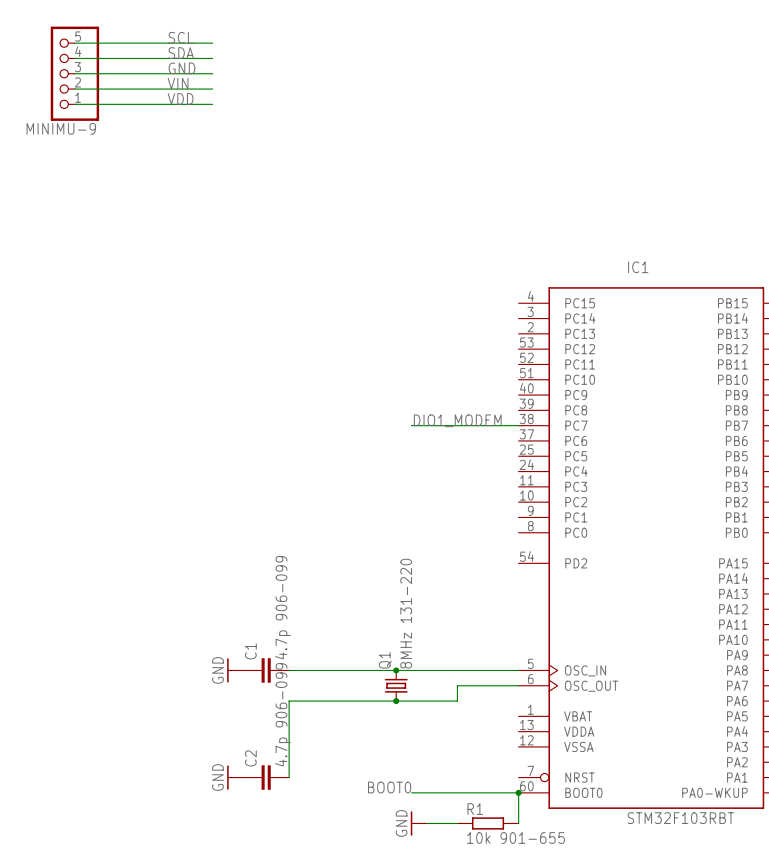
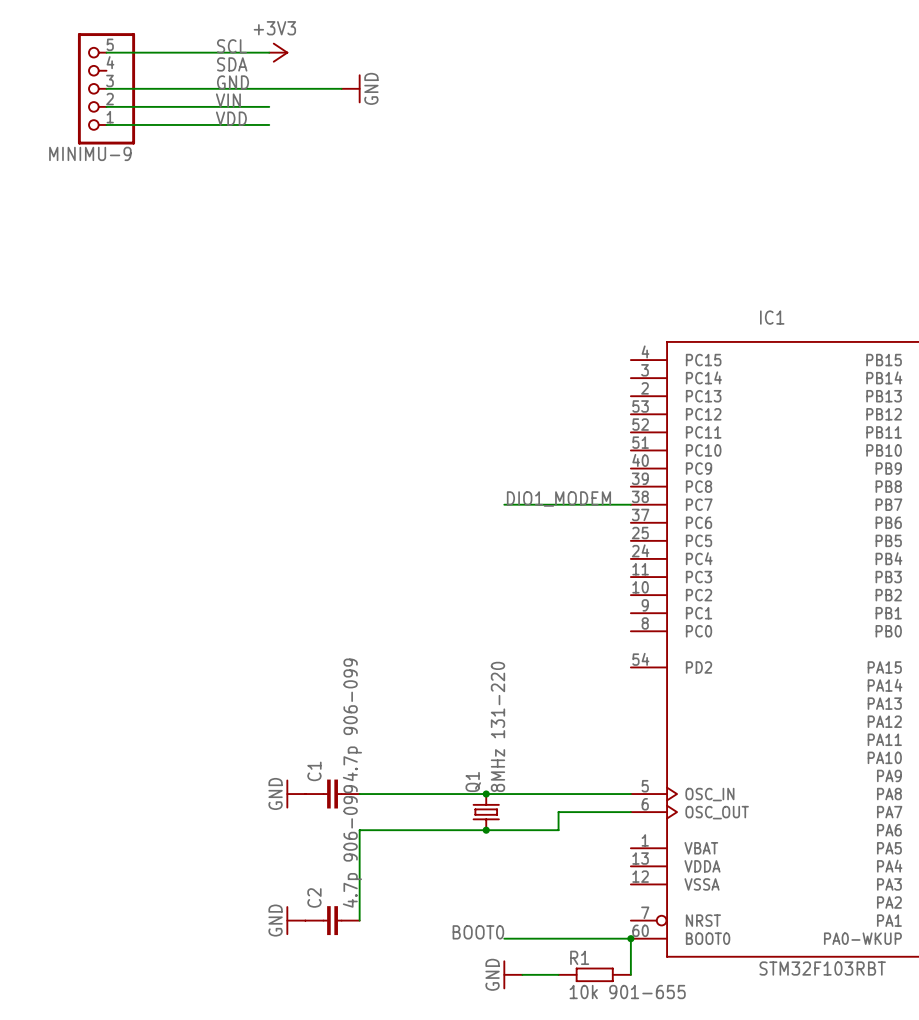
power symbol: none -> +3V3 (278, 52)
wire: (74, 58) (212, 58) -> none
wire: none -> (269, 88) (341, 88)
power symbol: none -> GND (351, 88)

